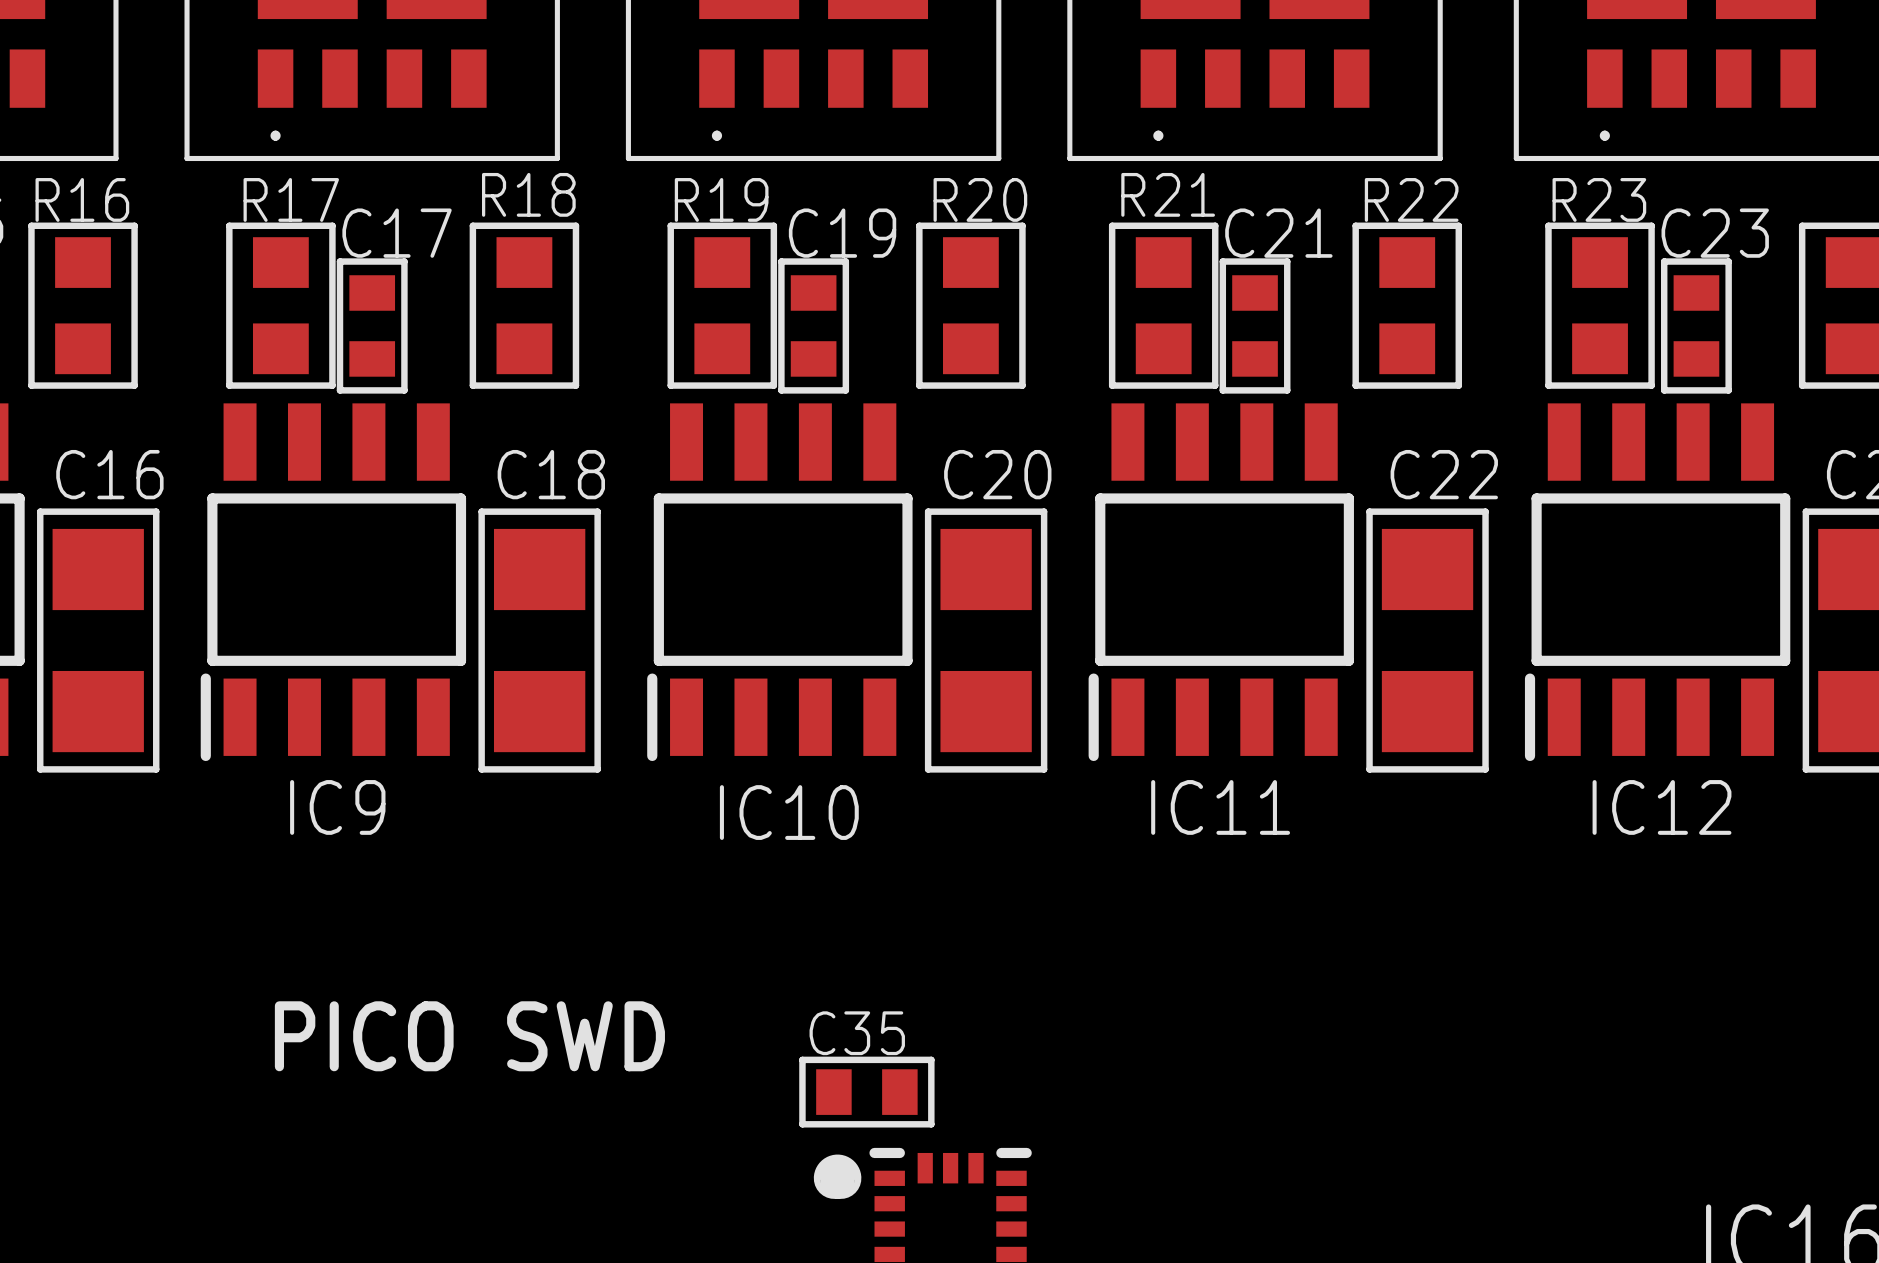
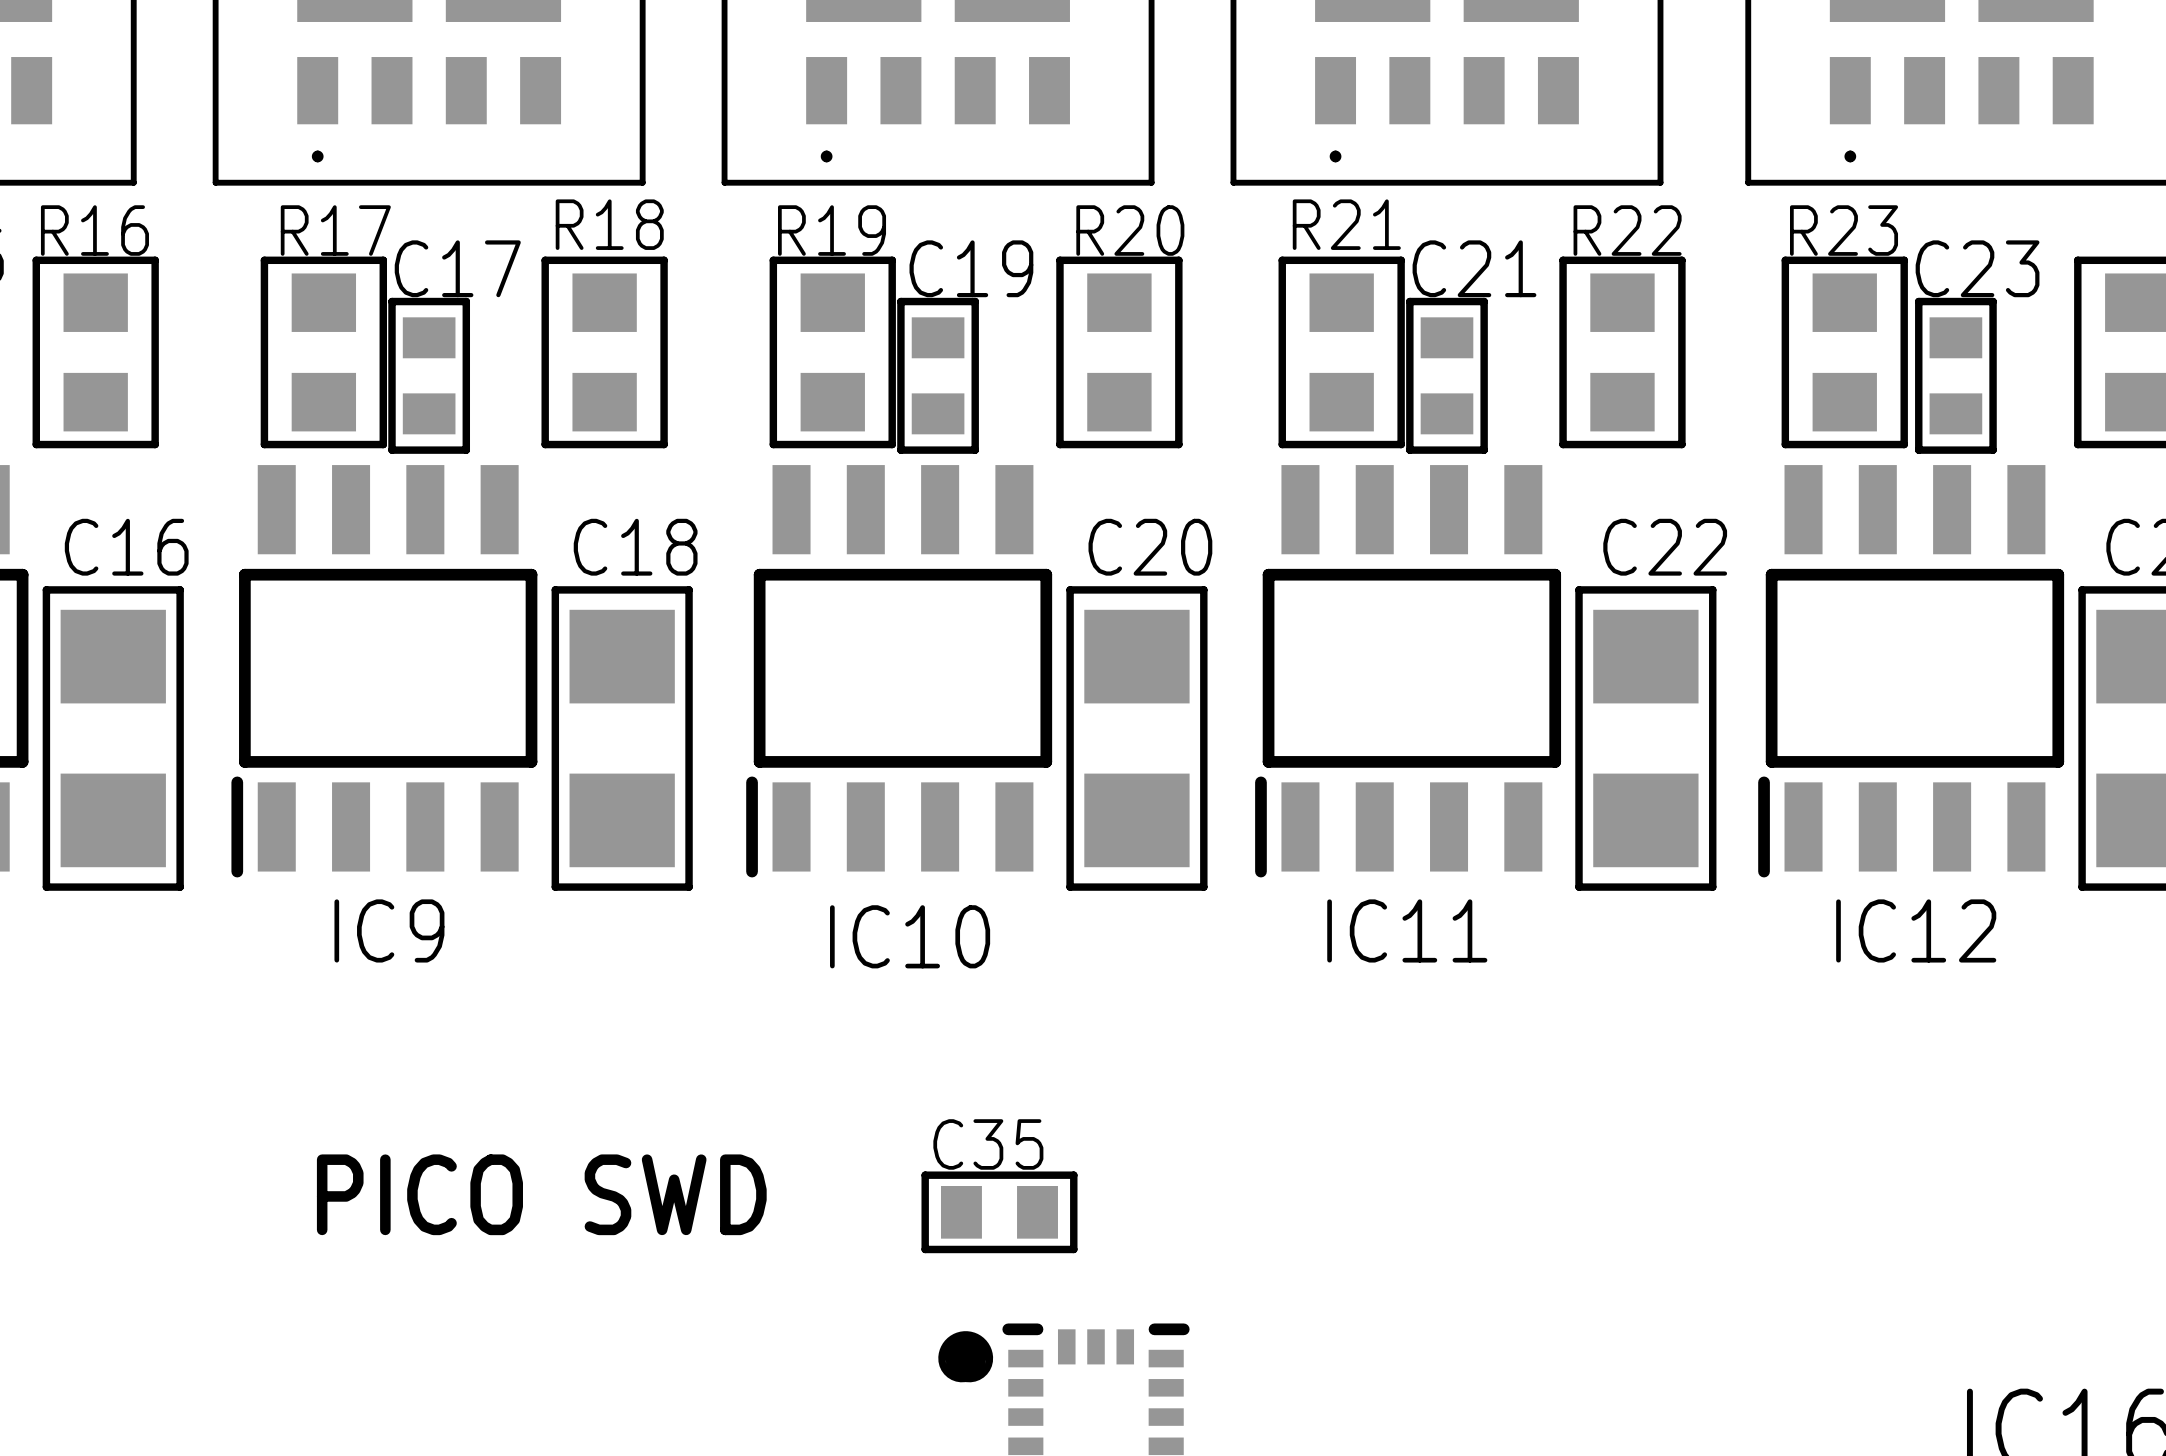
C35 position: (866, 1092) -> (999, 1212)

